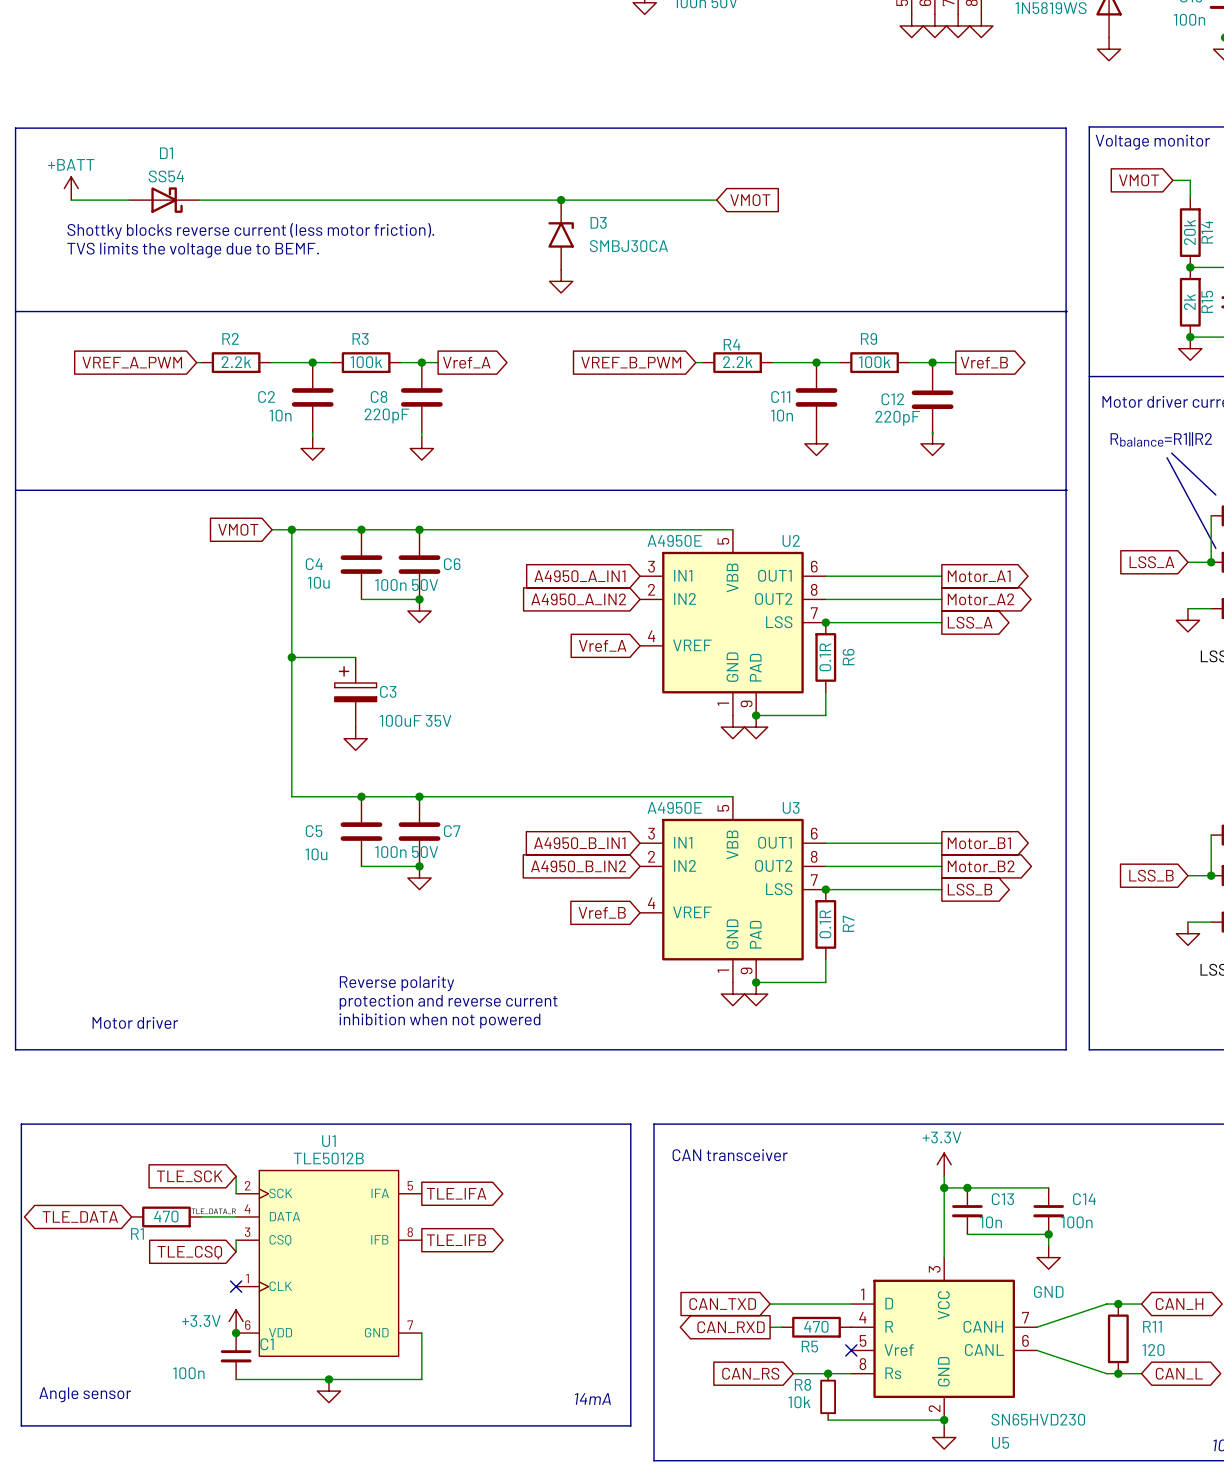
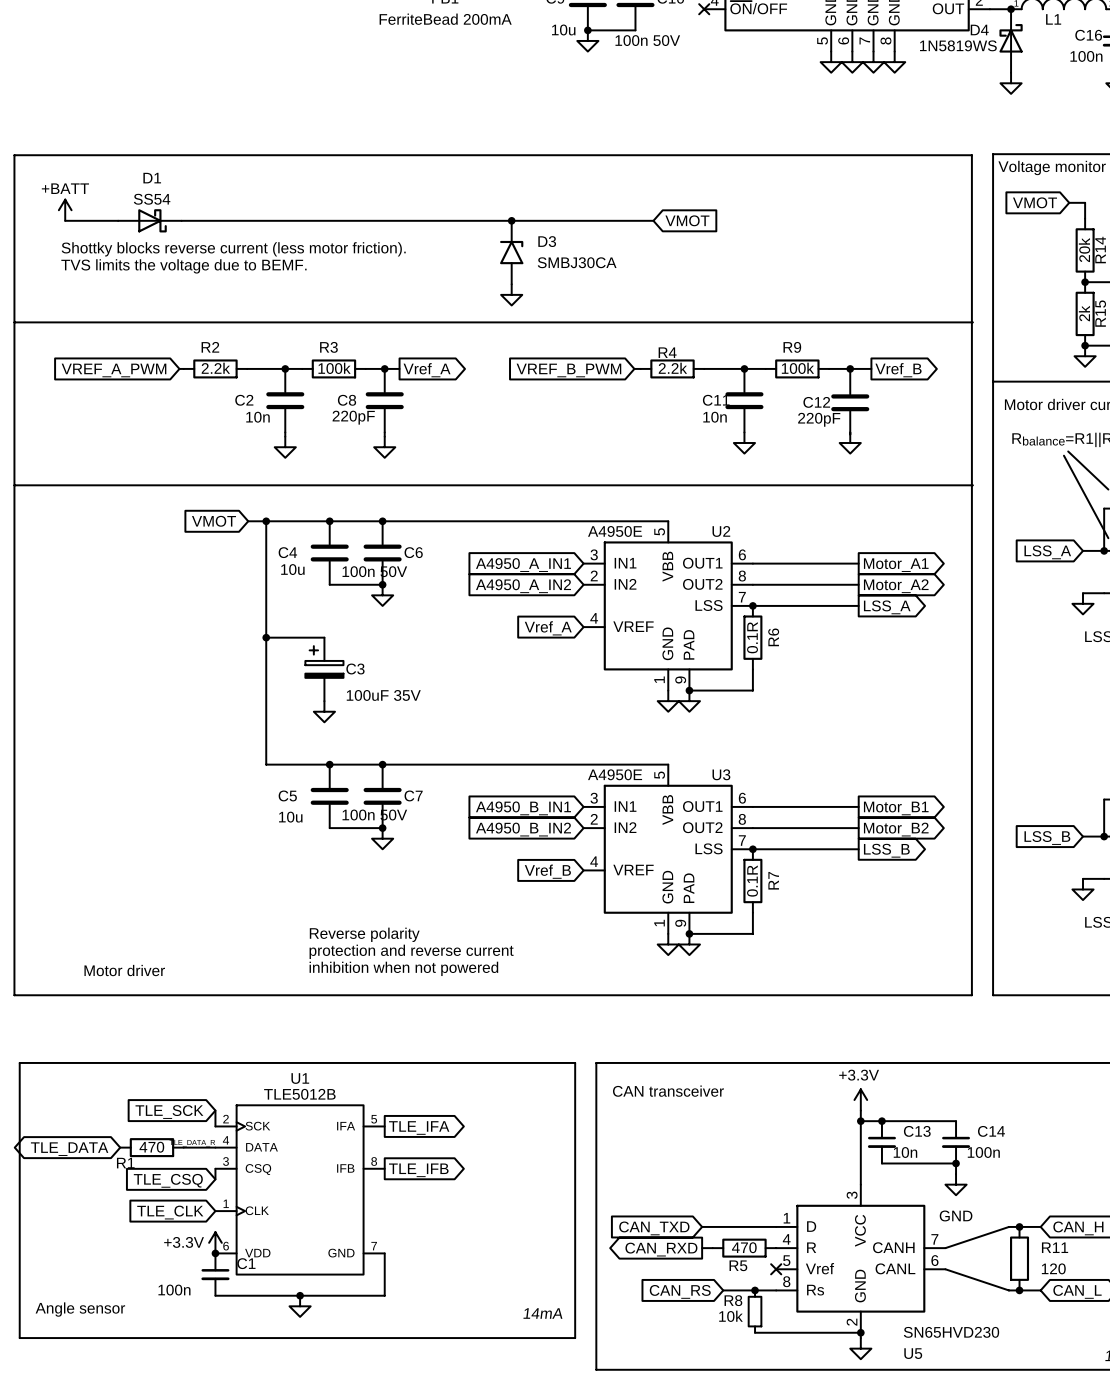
global label: none -> TLE_CLK (170, 1212)
no-connect mark: (236, 1286) -> none

